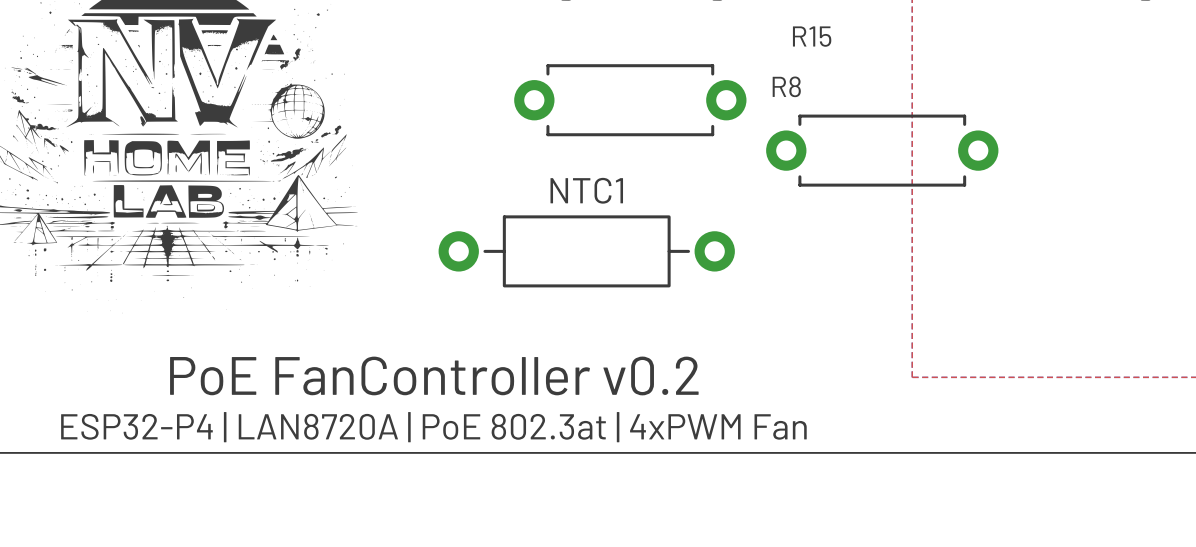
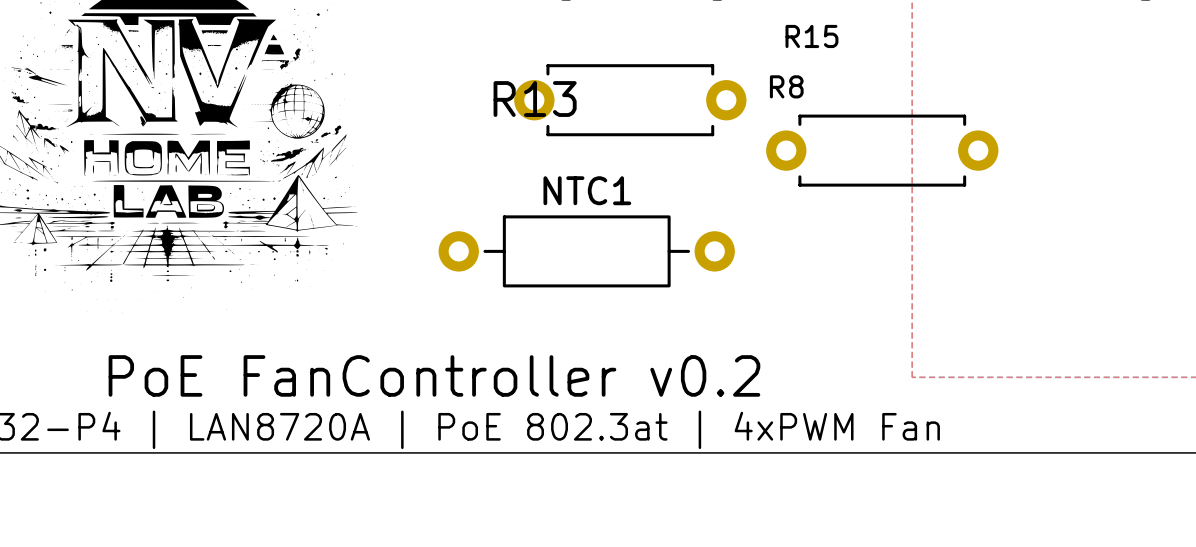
R13 name: none -> R13 (535, 99)

